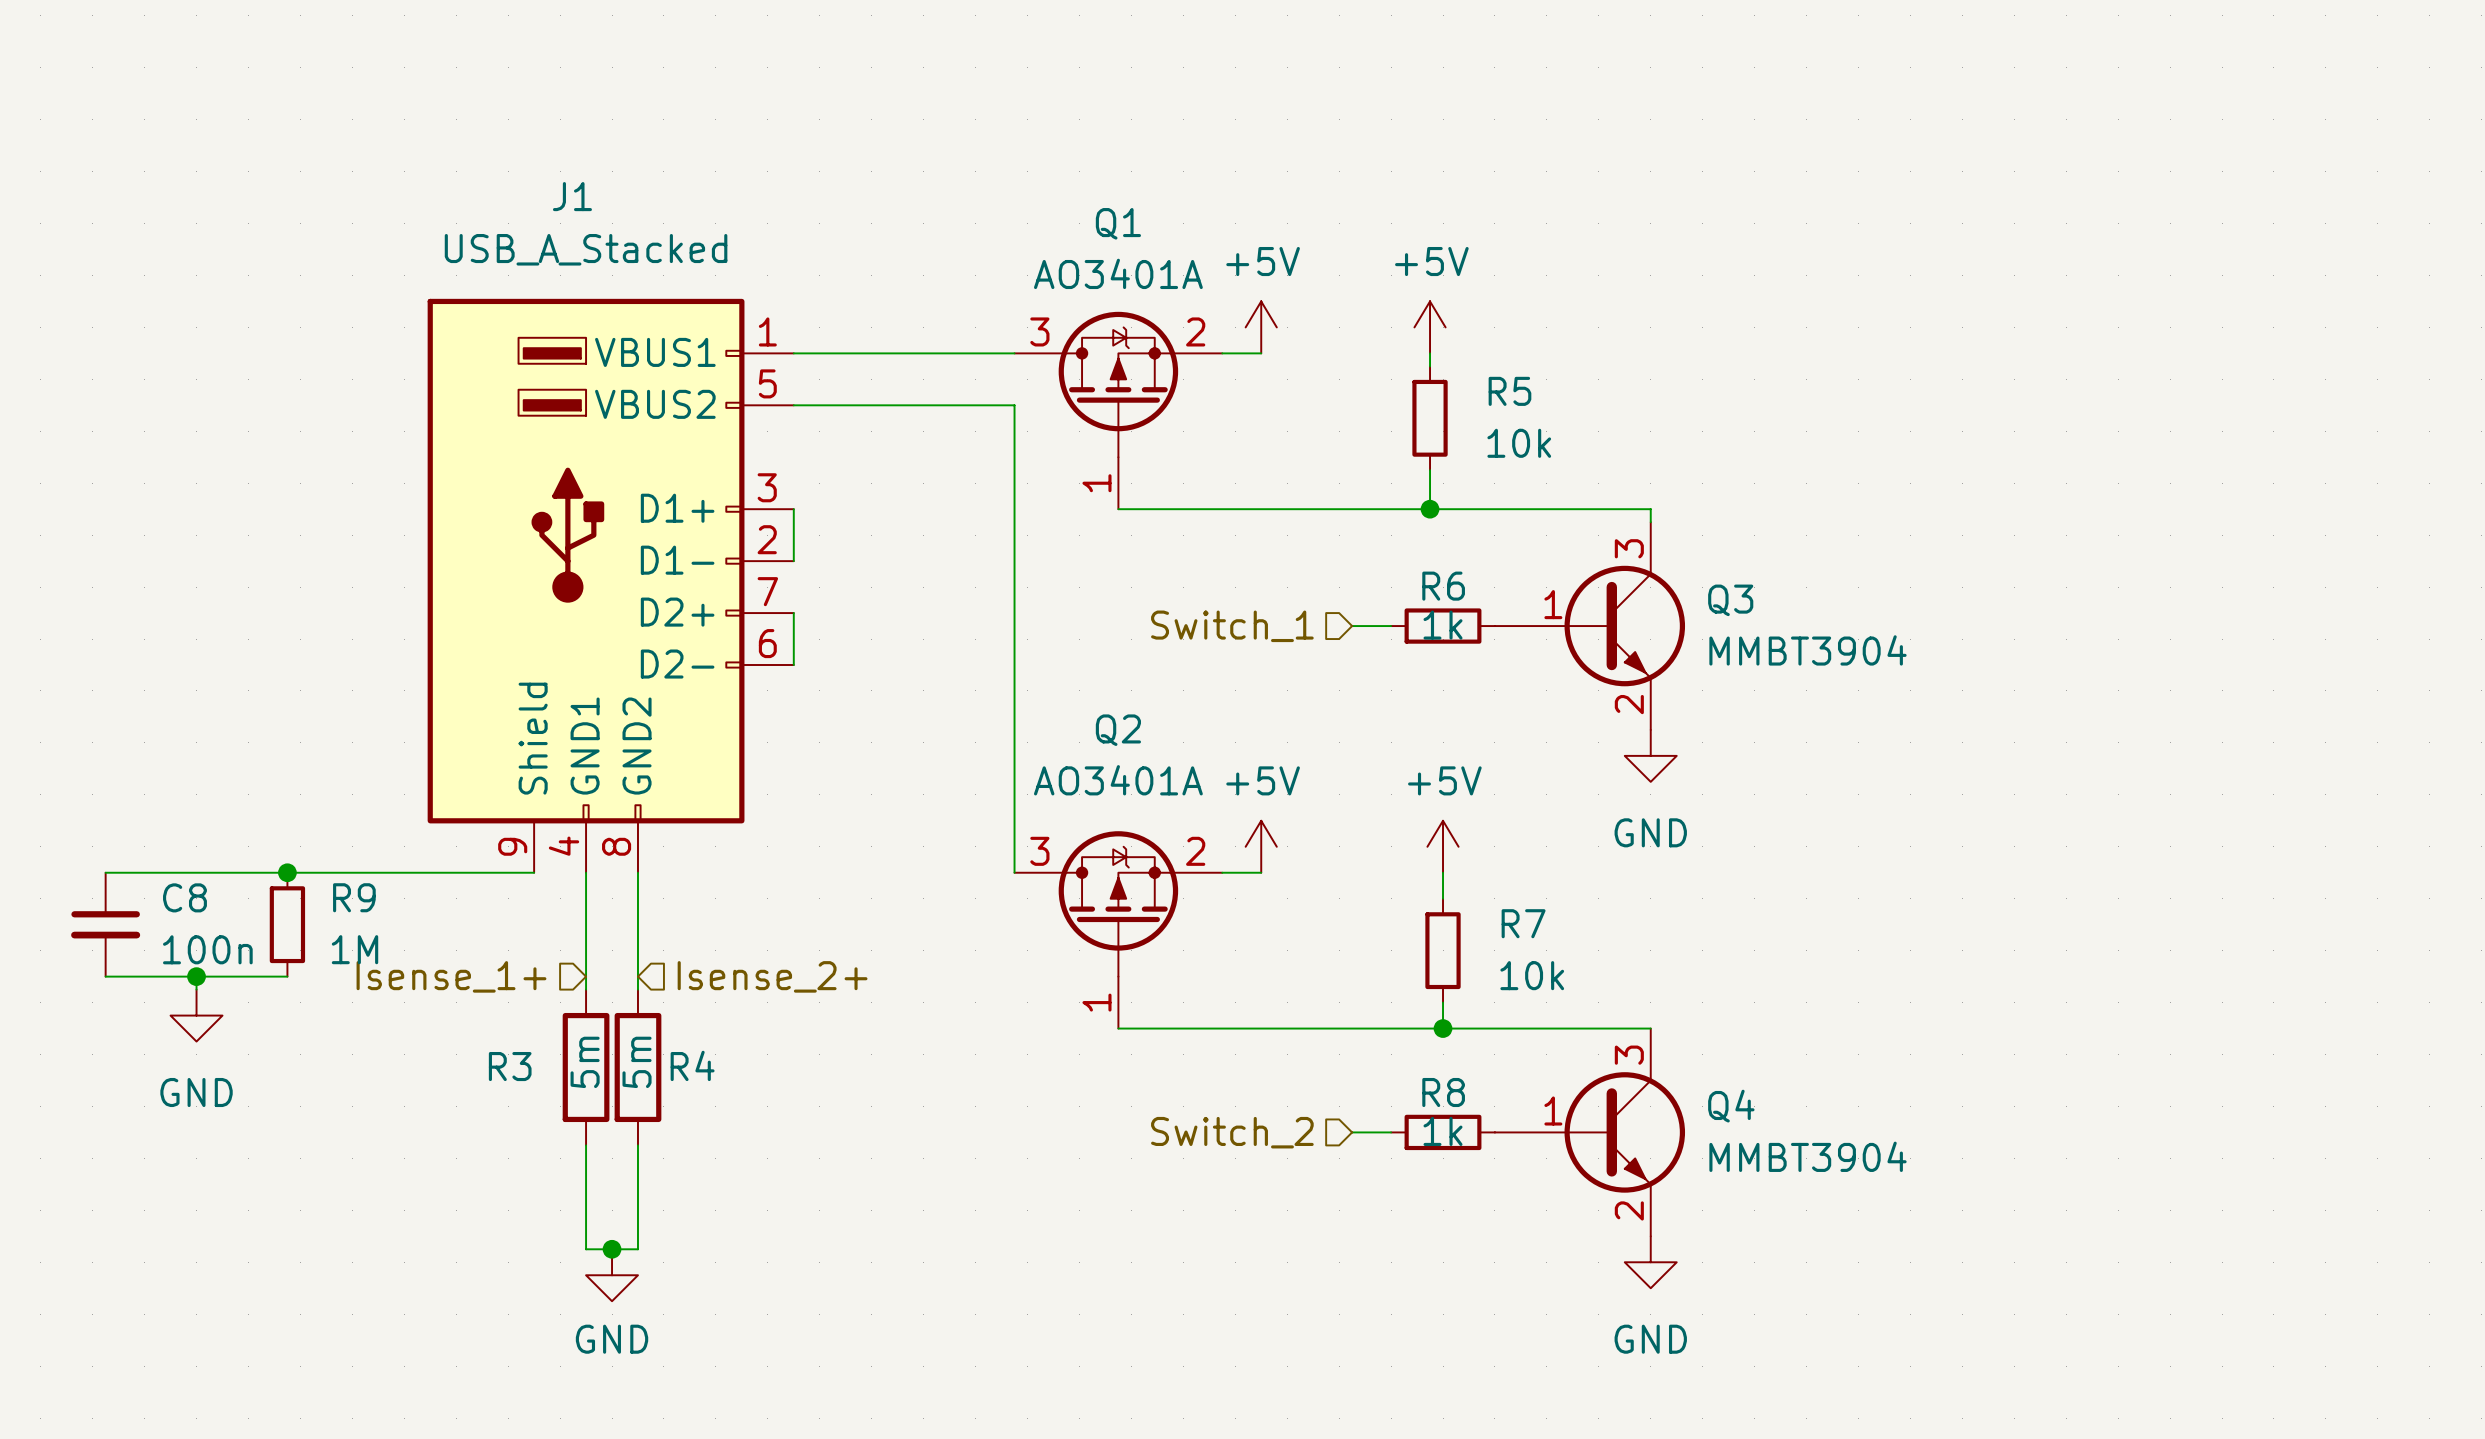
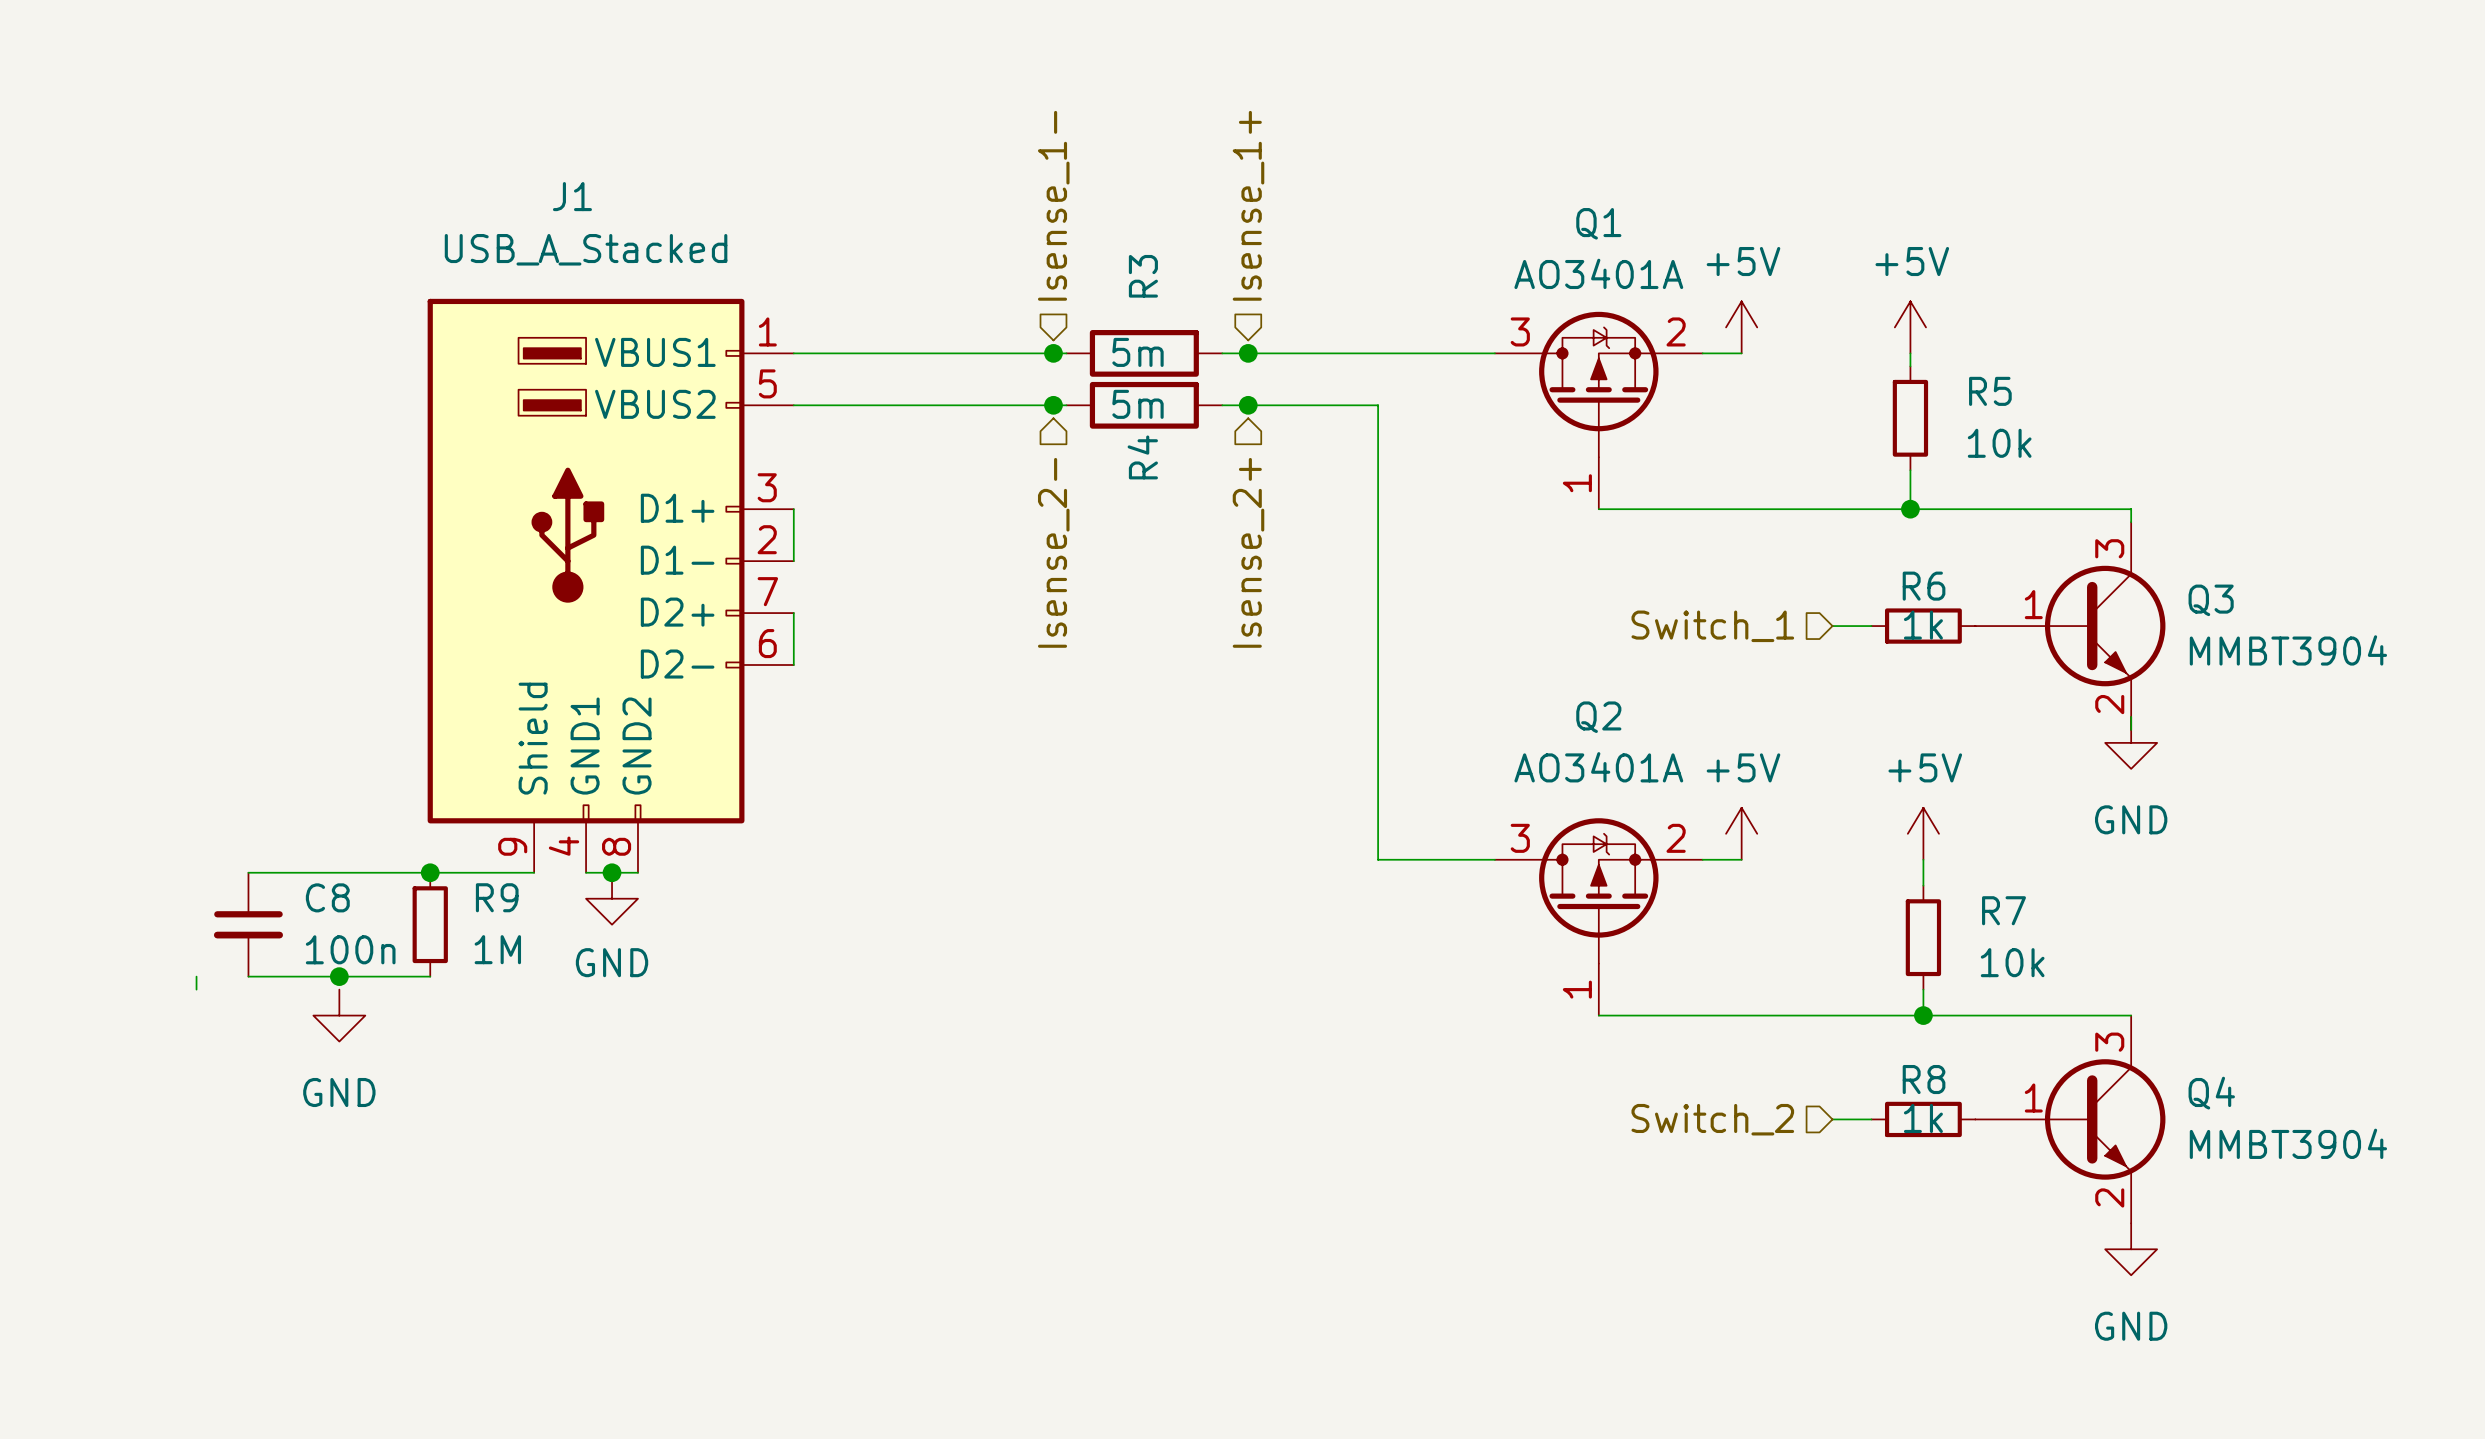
hierarchical label: none -> Isense_1- (1053, 205)
hierarchical label: none -> Isense_1+ (1248, 205)
power symbol: +5V (1261, 327) -> none
power symbol: +5V (1430, 327) -> none
power symbol: none -> +5V (1741, 327)
power symbol: none -> +5V (1910, 327)
junction: none -> (1053, 353)
junction: none -> (1248, 353)
wire: none -> (1261, 353) (1494, 353)
wire: (1430, 353) (1430, 366) -> (1910, 353) (1910, 366)
wire: none -> (1702, 353) (1741, 353)
wire: (1014, 405) (1014, 872) -> (1014, 405) (1066, 405)
junction: none -> (1053, 405)
wire: none -> (1222, 405) (1378, 405) (1378, 859) (1494, 859)
junction: none -> (1248, 405)
Q1 position: (1118, 410) -> (1598, 410)
R5 position: (1430, 418) -> (1910, 418)
wire: (1430, 470) (1430, 509) -> (1910, 470) (1910, 509)
wire: (1118, 509) (1598, 509) -> none
junction: (1430, 509) -> none
wire: (1650, 509) (1650, 522) -> (1650, 509) (2131, 509) (2131, 522)
junction: none -> (1910, 509)
hierarchical label: none -> Isense_2- (1053, 552)
hierarchical label: none -> Isense_2+ (1248, 552)
hierarchical label position: Switch_1 (1232, 626) -> Switch_1 (1712, 626)
wire: (1352, 626) (1391, 626) -> (1832, 626) (1871, 626)
R6 position: (1443, 626) -> (1923, 626)
Q3 position: (1589, 626) -> (2070, 626)
wire: none -> (2131, 716) (2131, 729)
power symbol: none -> GND (2131, 742)
power symbol: GND (1650, 755) -> none
power symbol: none -> +5V (1741, 833)
power symbol: none -> +5V (1923, 833)
power symbol: +5V (1261, 846) -> none
power symbol: +5V (1443, 846) -> none
wire: (105, 872) (248, 872) -> none
junction: (287, 872) -> none
junction: none -> (430, 872)
wire: (586, 872) (586, 989) -> (586, 872) (637, 872)
junction: none -> (612, 872)
wire: (637, 872) (637, 989) -> none
wire: (1222, 872) (1261, 872) -> (1702, 859) (1741, 859)
wire: (1443, 872) (1443, 898) -> (1923, 859) (1923, 885)
power symbol: none -> GND (612, 898)
C8 position: (105, 924) -> (248, 924)
R9 position: (287, 924) -> (430, 924)
Q2 position: (1118, 929) -> (1598, 916)
R7 position: (1443, 950) -> (1923, 937)
wire: (105, 976) (248, 976) -> (287, 976) (430, 976)
junction: (196, 976) -> none
junction: none -> (339, 976)
hierarchical label: Isense_1+ (451, 976) -> none
hierarchical label: Isense_2+ (772, 976) -> none
wire: (1443, 1002) (1443, 1028) -> (1923, 989) (1923, 1015)
power symbol position: GND (196, 1015) -> GND (339, 1015)
junction: none -> (1923, 1015)
wire: (1118, 1028) (1650, 1028) -> (1598, 1015) (2131, 1015)
junction: (1443, 1028) -> none
R3 rotation: 0° (586, 1067) -> 90° clockwise (1144, 353)
R3 position: (586, 1067) -> (1144, 353)
R4 rotation: 0° (637, 1067) -> 90° clockwise (1144, 405)
R4 position: (637, 1067) -> (1144, 405)
hierarchical label position: Switch_2 (1232, 1132) -> Switch_2 (1712, 1119)
wire: (1352, 1132) (1391, 1132) -> (1832, 1119) (1871, 1119)
R8 position: (1443, 1132) -> (1923, 1119)
Q4 position: (1589, 1132) -> (2070, 1119)
wire: (586, 1145) (586, 1249) (637, 1249) (637, 1145) -> none
junction: (612, 1249) -> none
power symbol: none -> GND (2131, 1249)
power symbol: GND (1650, 1262) -> none
power symbol: GND (612, 1275) -> none

